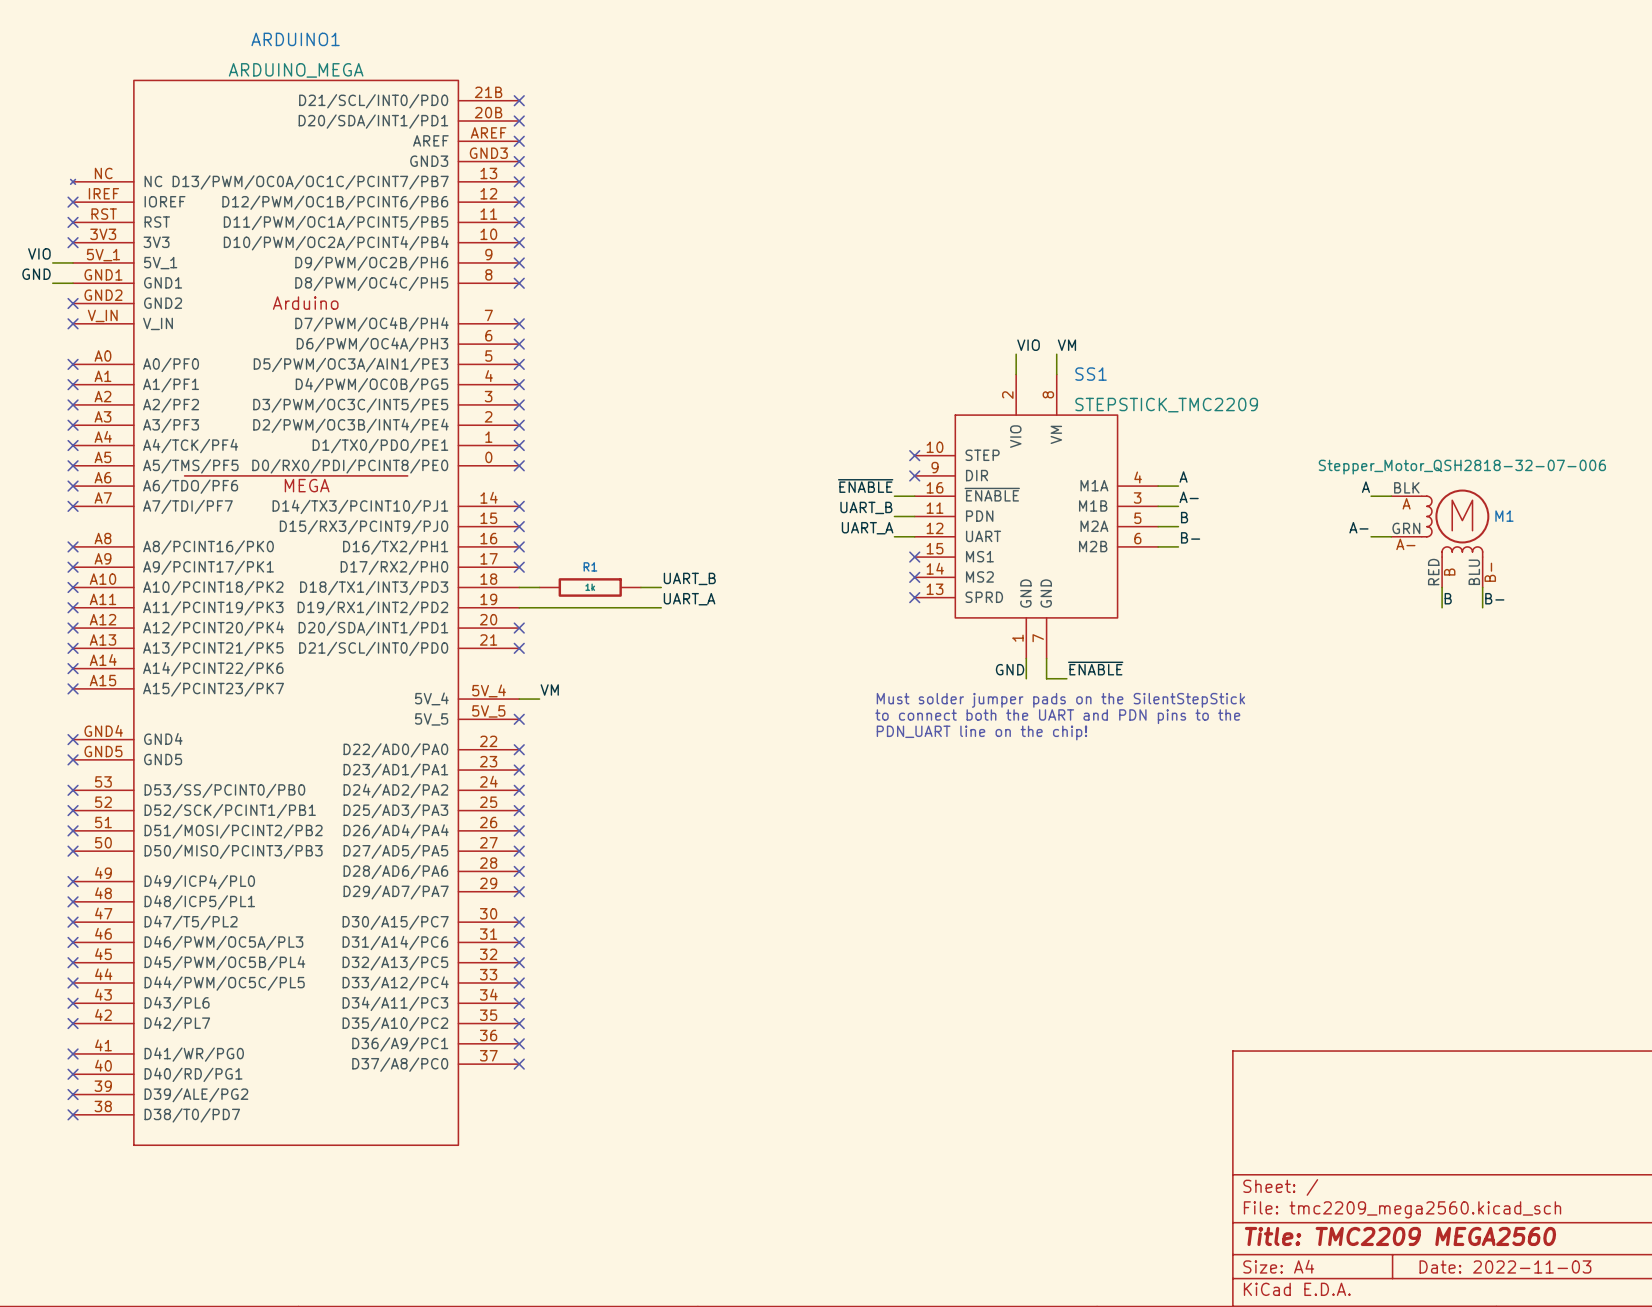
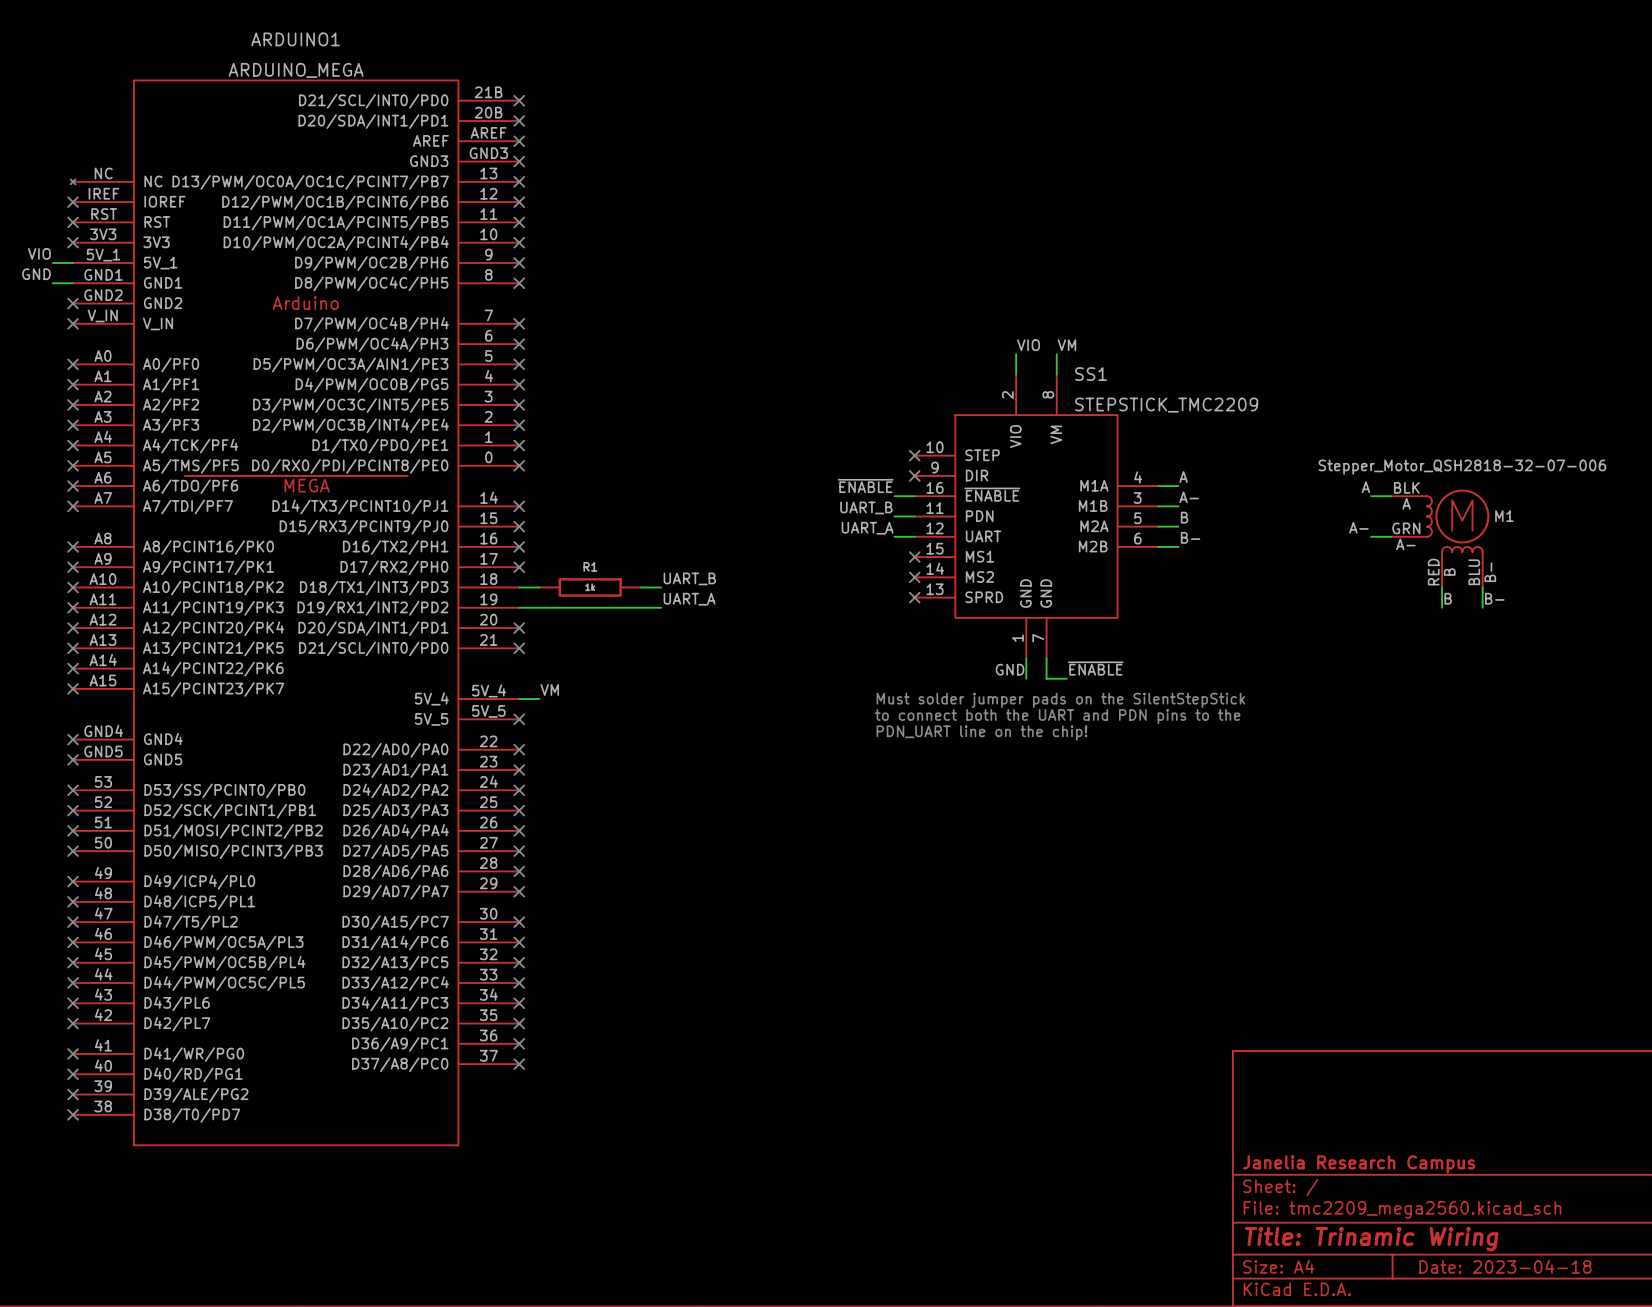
title block: none -> Janelia Research Campus (1359, 1164)
title block: Title: TMC2209 MEGA2560 (1400, 1236) -> Title: Trinamic Wiring (1371, 1239)
title block: Date: 2022-11-03 (1505, 1266) -> Date: 2023-04-18 (1505, 1266)

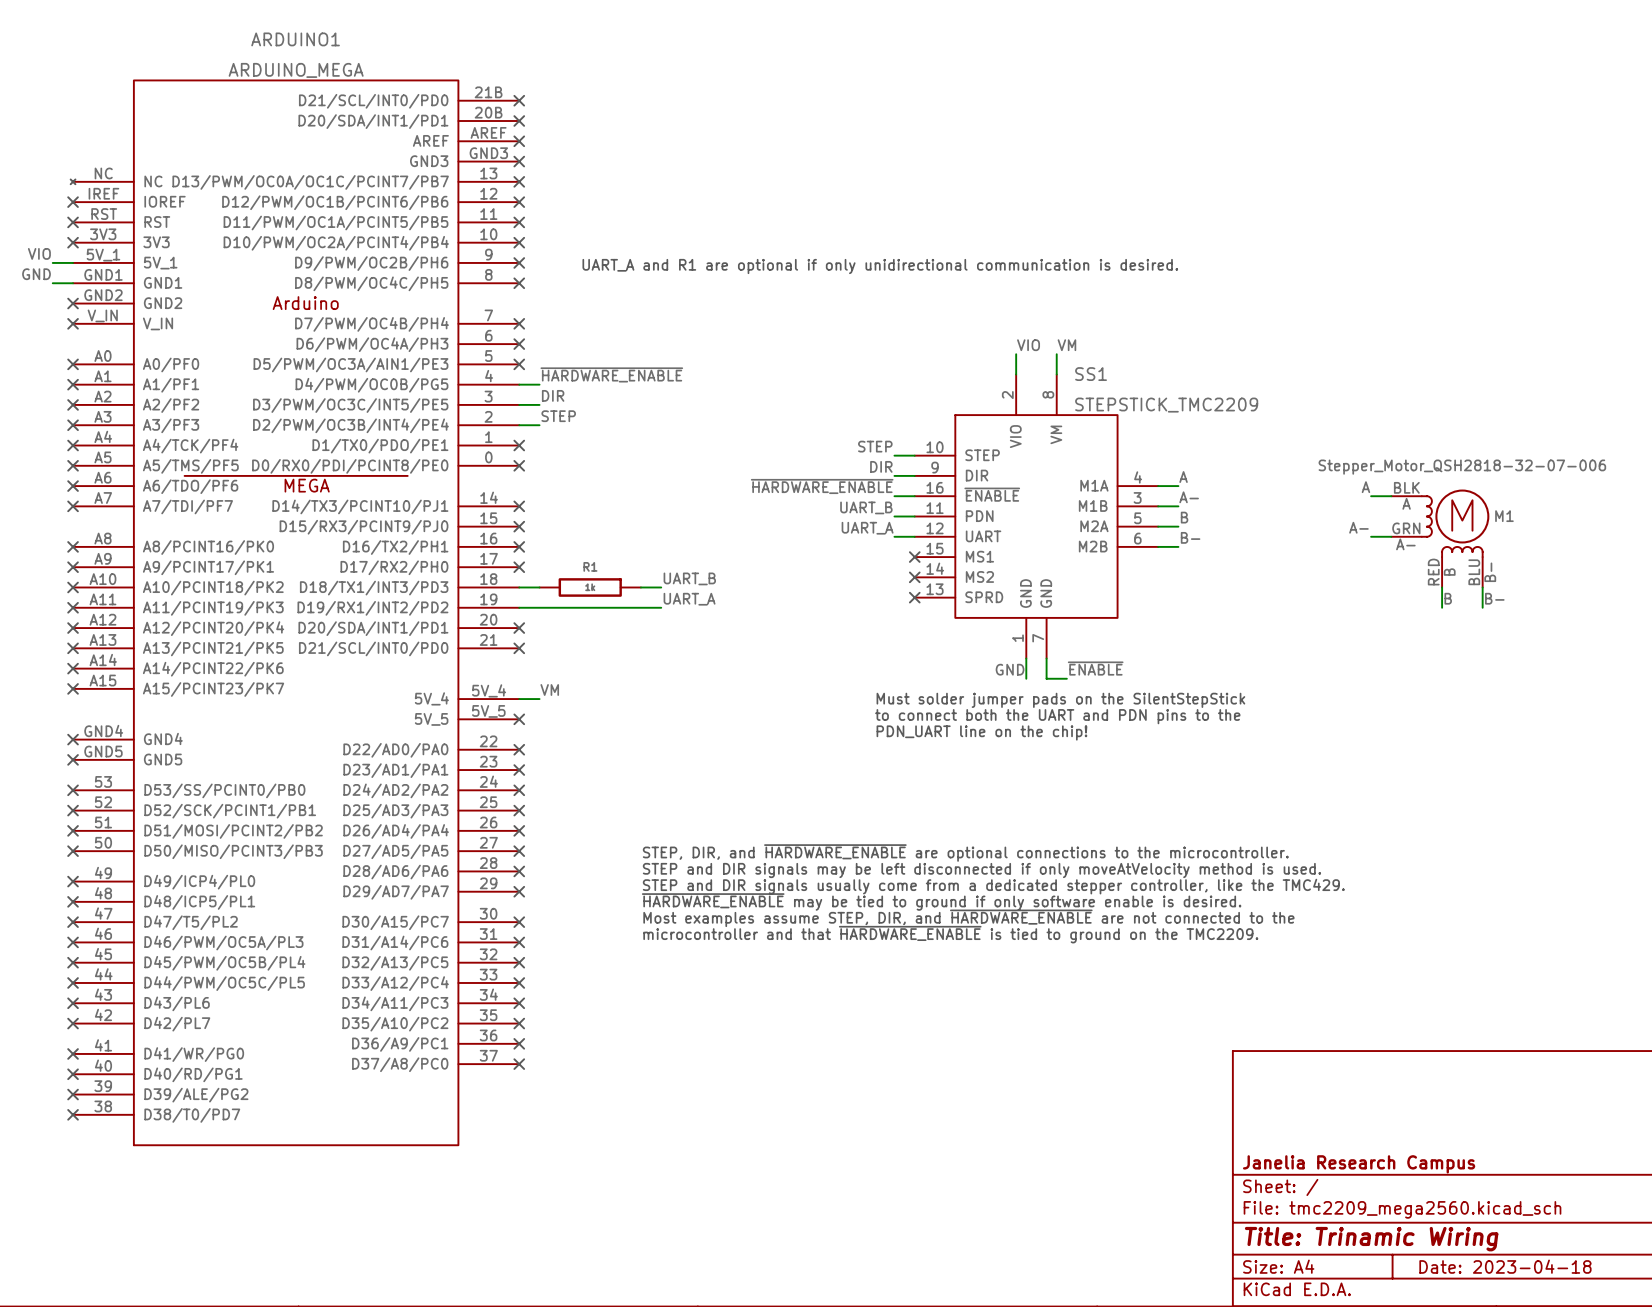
text: none -> UART_A and R1 are optional if only unidirectional communication is desired. (880, 266)
label: none -> ~{HARDWARE_ENABLE} (611, 374)
wire: none -> (519, 384) (539, 384)
no-connect mark: (519, 384) -> none
label: none -> DIR (553, 395)
wire: none -> (519, 404) (539, 404)
no-connect mark: (519, 404) -> none
label: none -> STEP (558, 416)
wire: none -> (519, 425) (539, 425)
no-connect mark: (519, 425) -> none
label: none -> STEP (875, 446)
wire: none -> (894, 455) (914, 455)
no-connect mark: (914, 455) -> none
label: none -> DIR (881, 466)
wire: none -> (894, 475) (914, 475)
no-connect mark: (914, 475) -> none
label: ~{ENABLE} (865, 486) -> ~{HARDWARE_ENABLE} (822, 486)
text: none -> STEP, DIR, and ~{HARDWARE_ENABLE} are optional connections to the microcontroller. (965, 853)
text: none -> STEP and DIR signals may be left disconnected if only moveAtVelocity method is used. (981, 870)
text: none -> STEP and DIR signals usually come from a dedicated stepper controller, like the TMC429. (993, 886)
text: none -> ~{HARDWARE_ENABLE} may be tied to ground if only software enable is desired. (941, 901)
text: none -> Most examples assume STEP, DIR, and ~{HARDWARE_ENABLE} are not connected to the (968, 918)
text: none -> microcontroller and that ~{HARDWARE_ENABLE} is tied to ground on the TMC2209. (950, 934)

